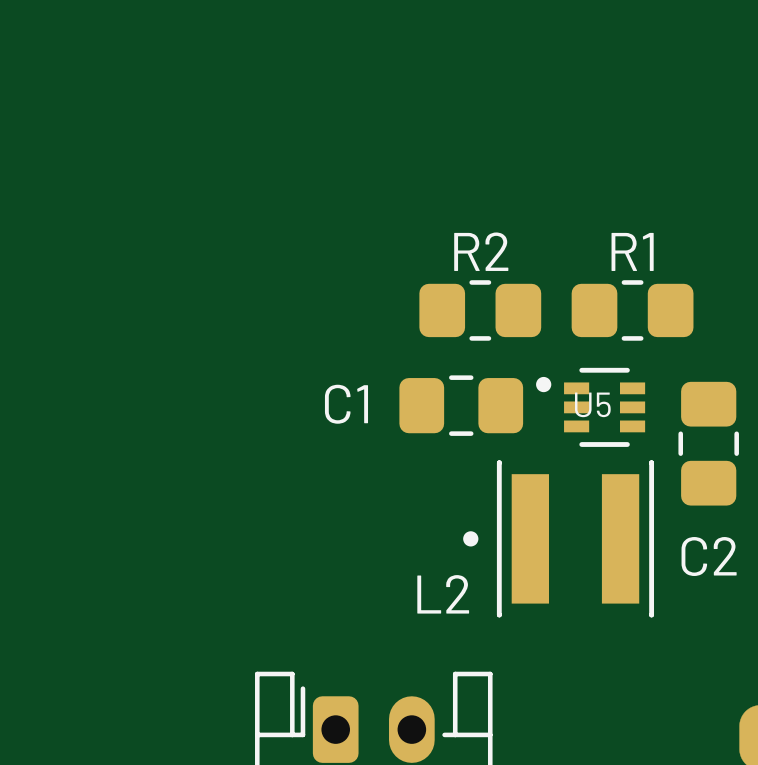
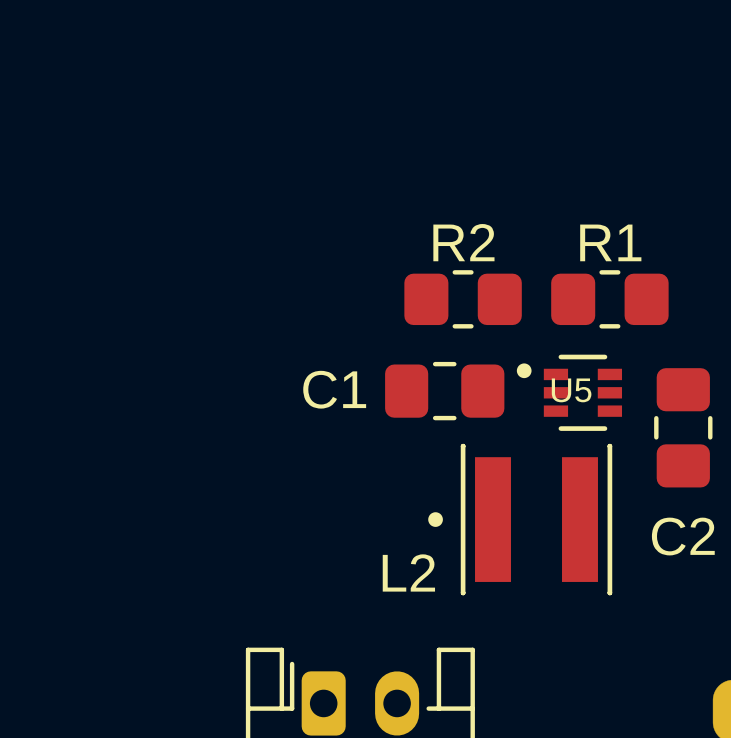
L2 position: (558, 538) -> (520, 519)

